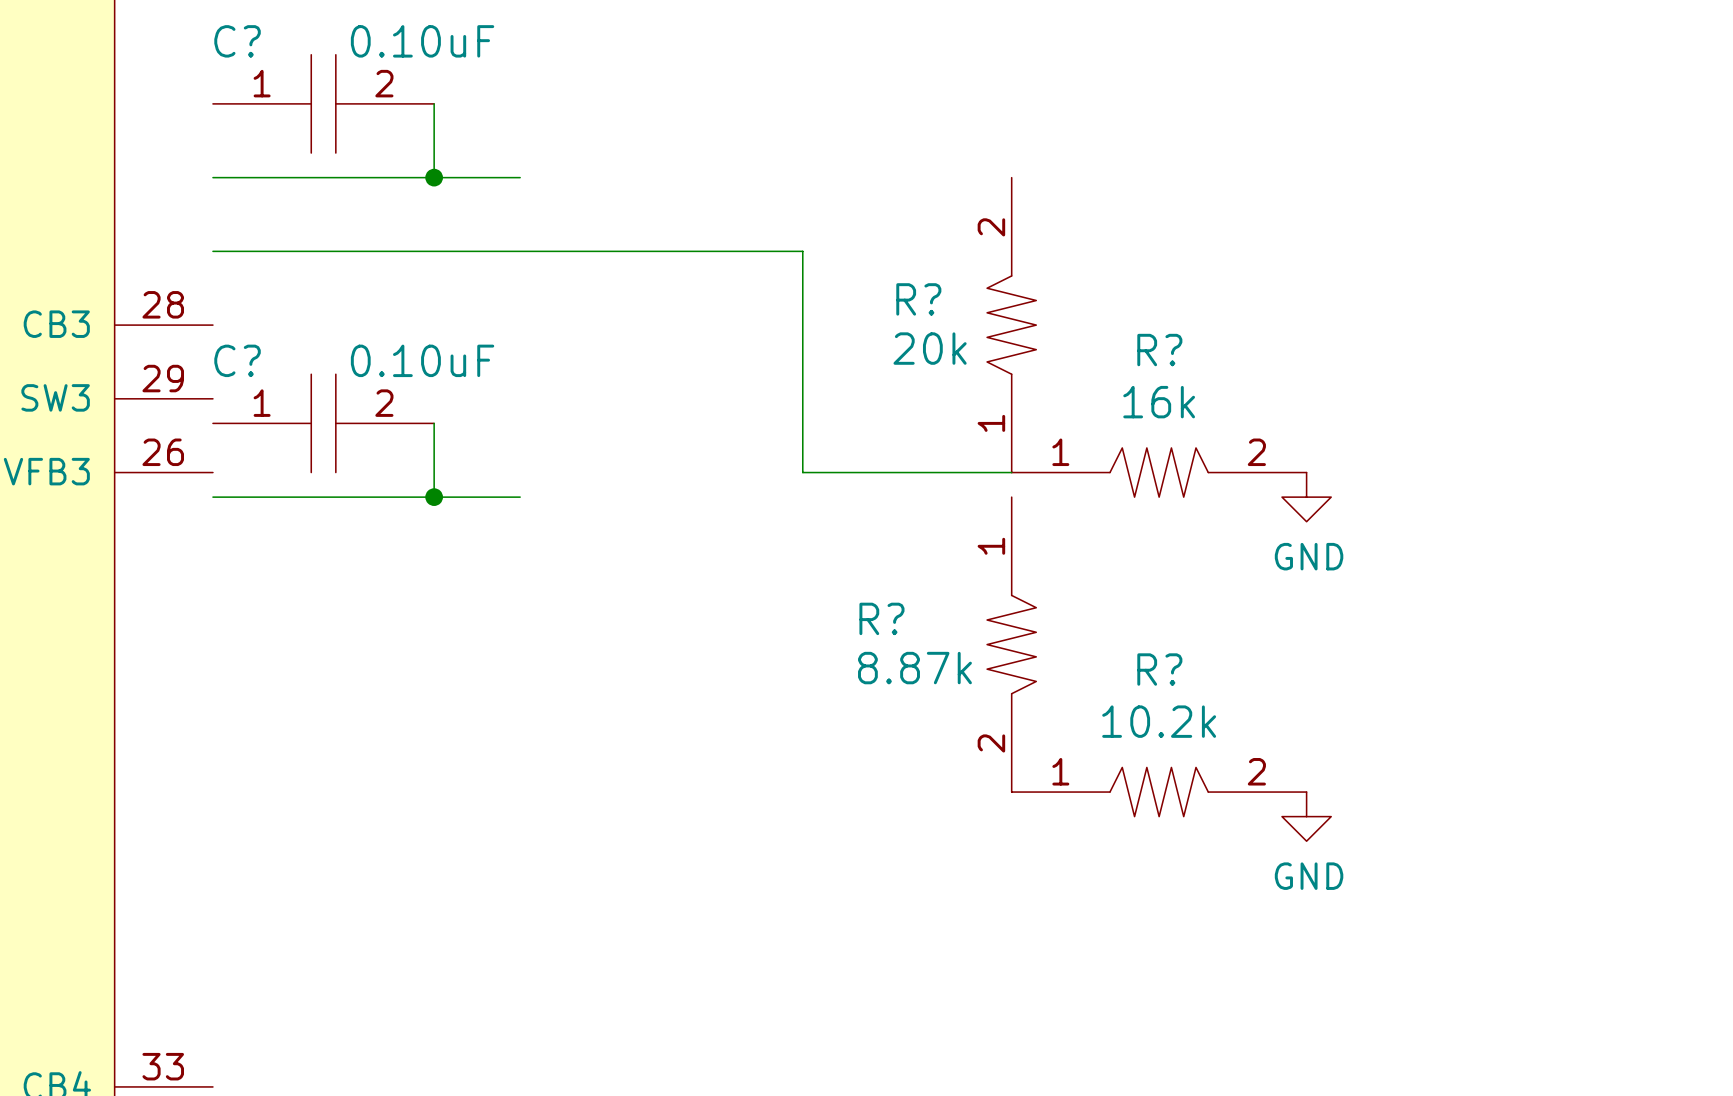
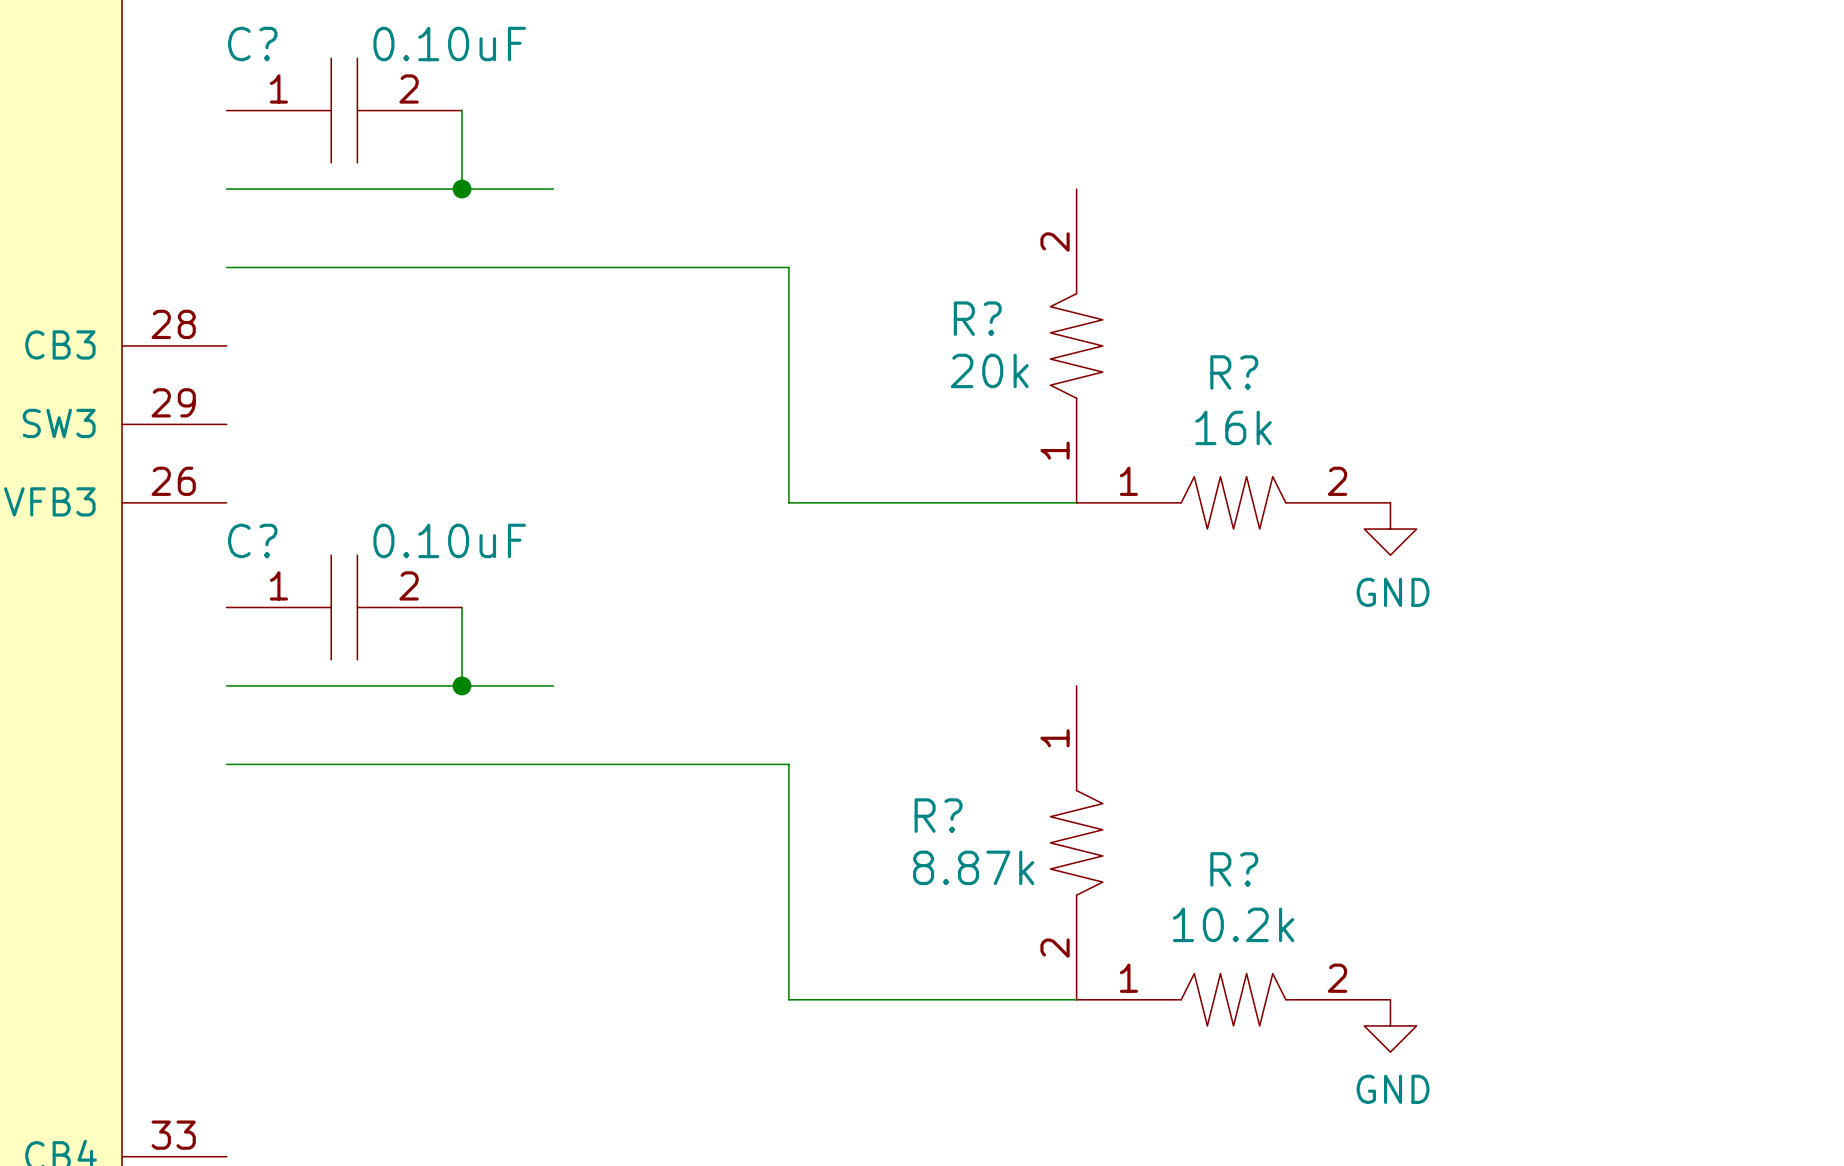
wire: (741, 251) (802, 251) (802, 472) -> (788, 267) (788, 502) (854, 502)
C? position: (323, 423) -> (344, 607)
wire: (434, 423) (434, 497) -> (462, 607) (462, 685)
wire: (212, 497) (520, 497) -> (226, 685) (553, 685)
junction: (434, 497) -> none
junction: none -> (462, 685)
R? position: (1011, 644) -> (1076, 842)
wire: none -> (226, 764) (788, 764) (788, 999) (1076, 999)
R? position: (1159, 792) -> (1233, 999)
power symbol position: GND (1306, 816) -> GND (1390, 1025)

